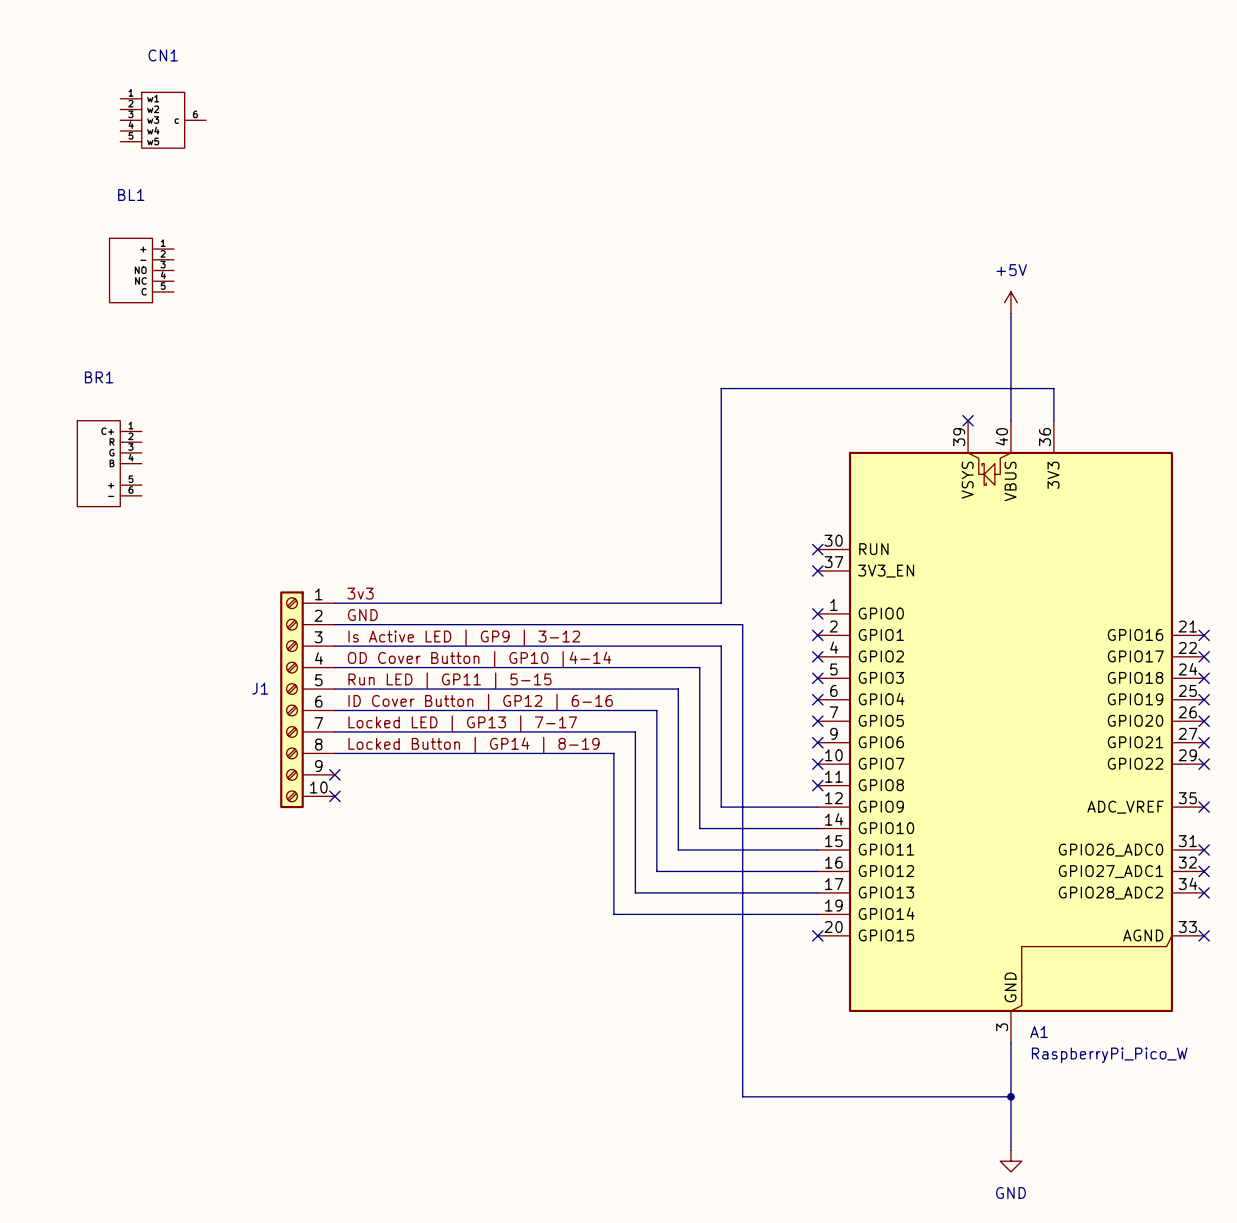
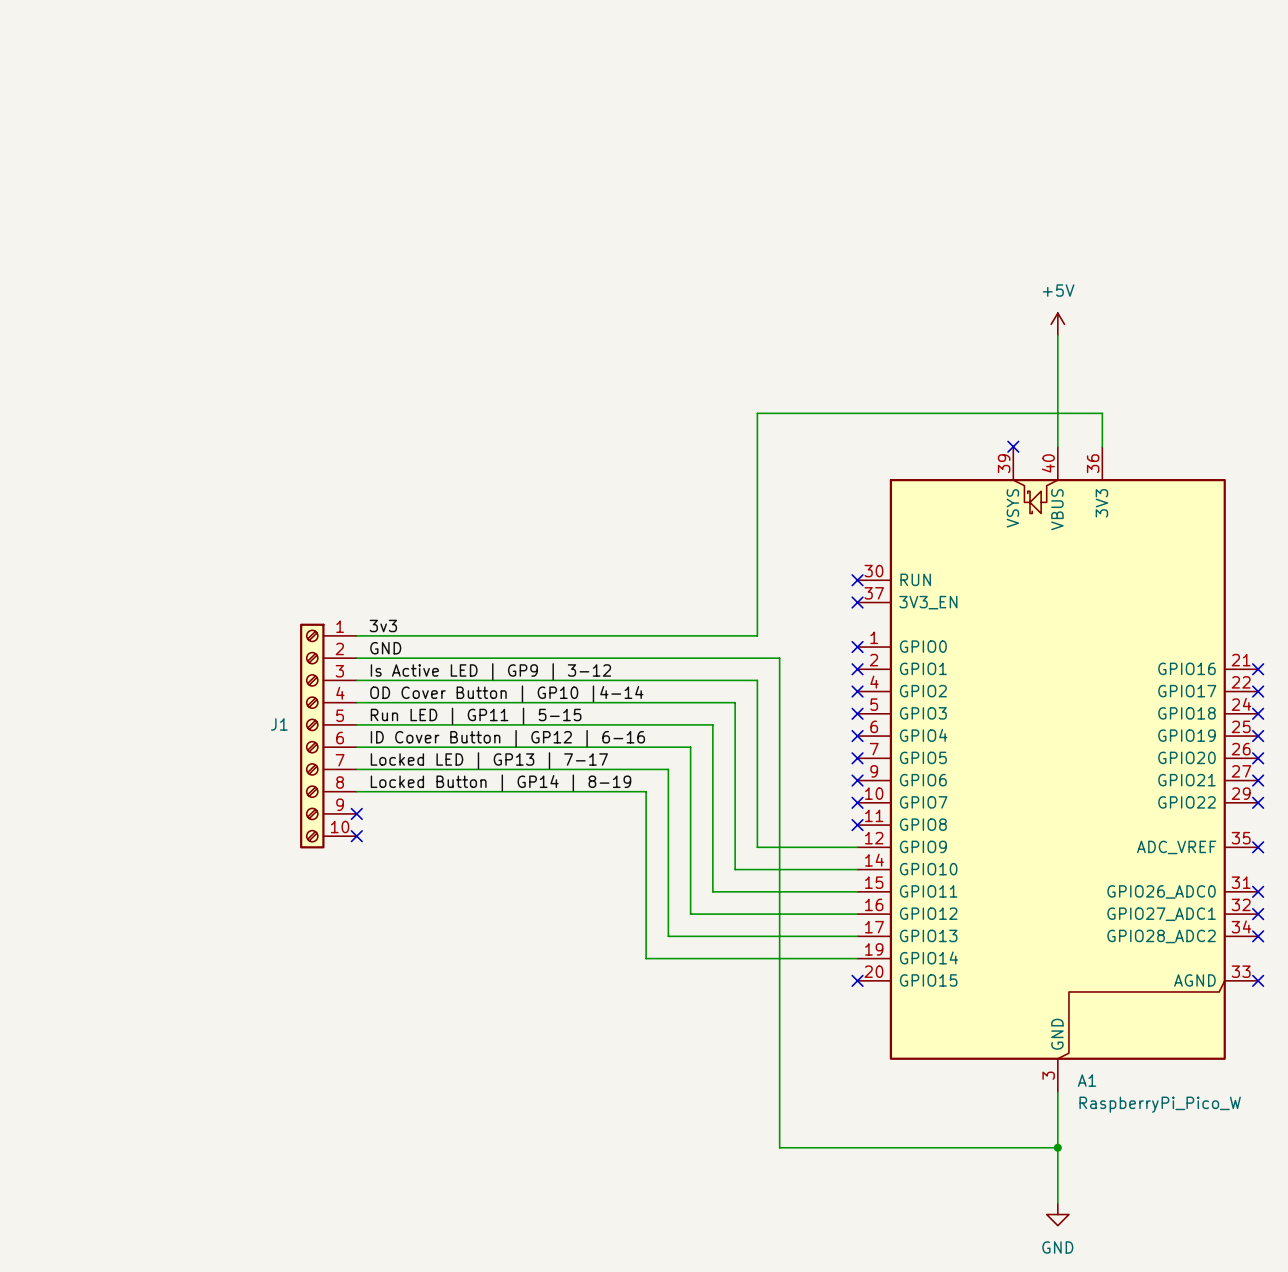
CN1: (163, 120) -> none
BL1: (141, 270) -> none
BR1: (109, 463) -> none

